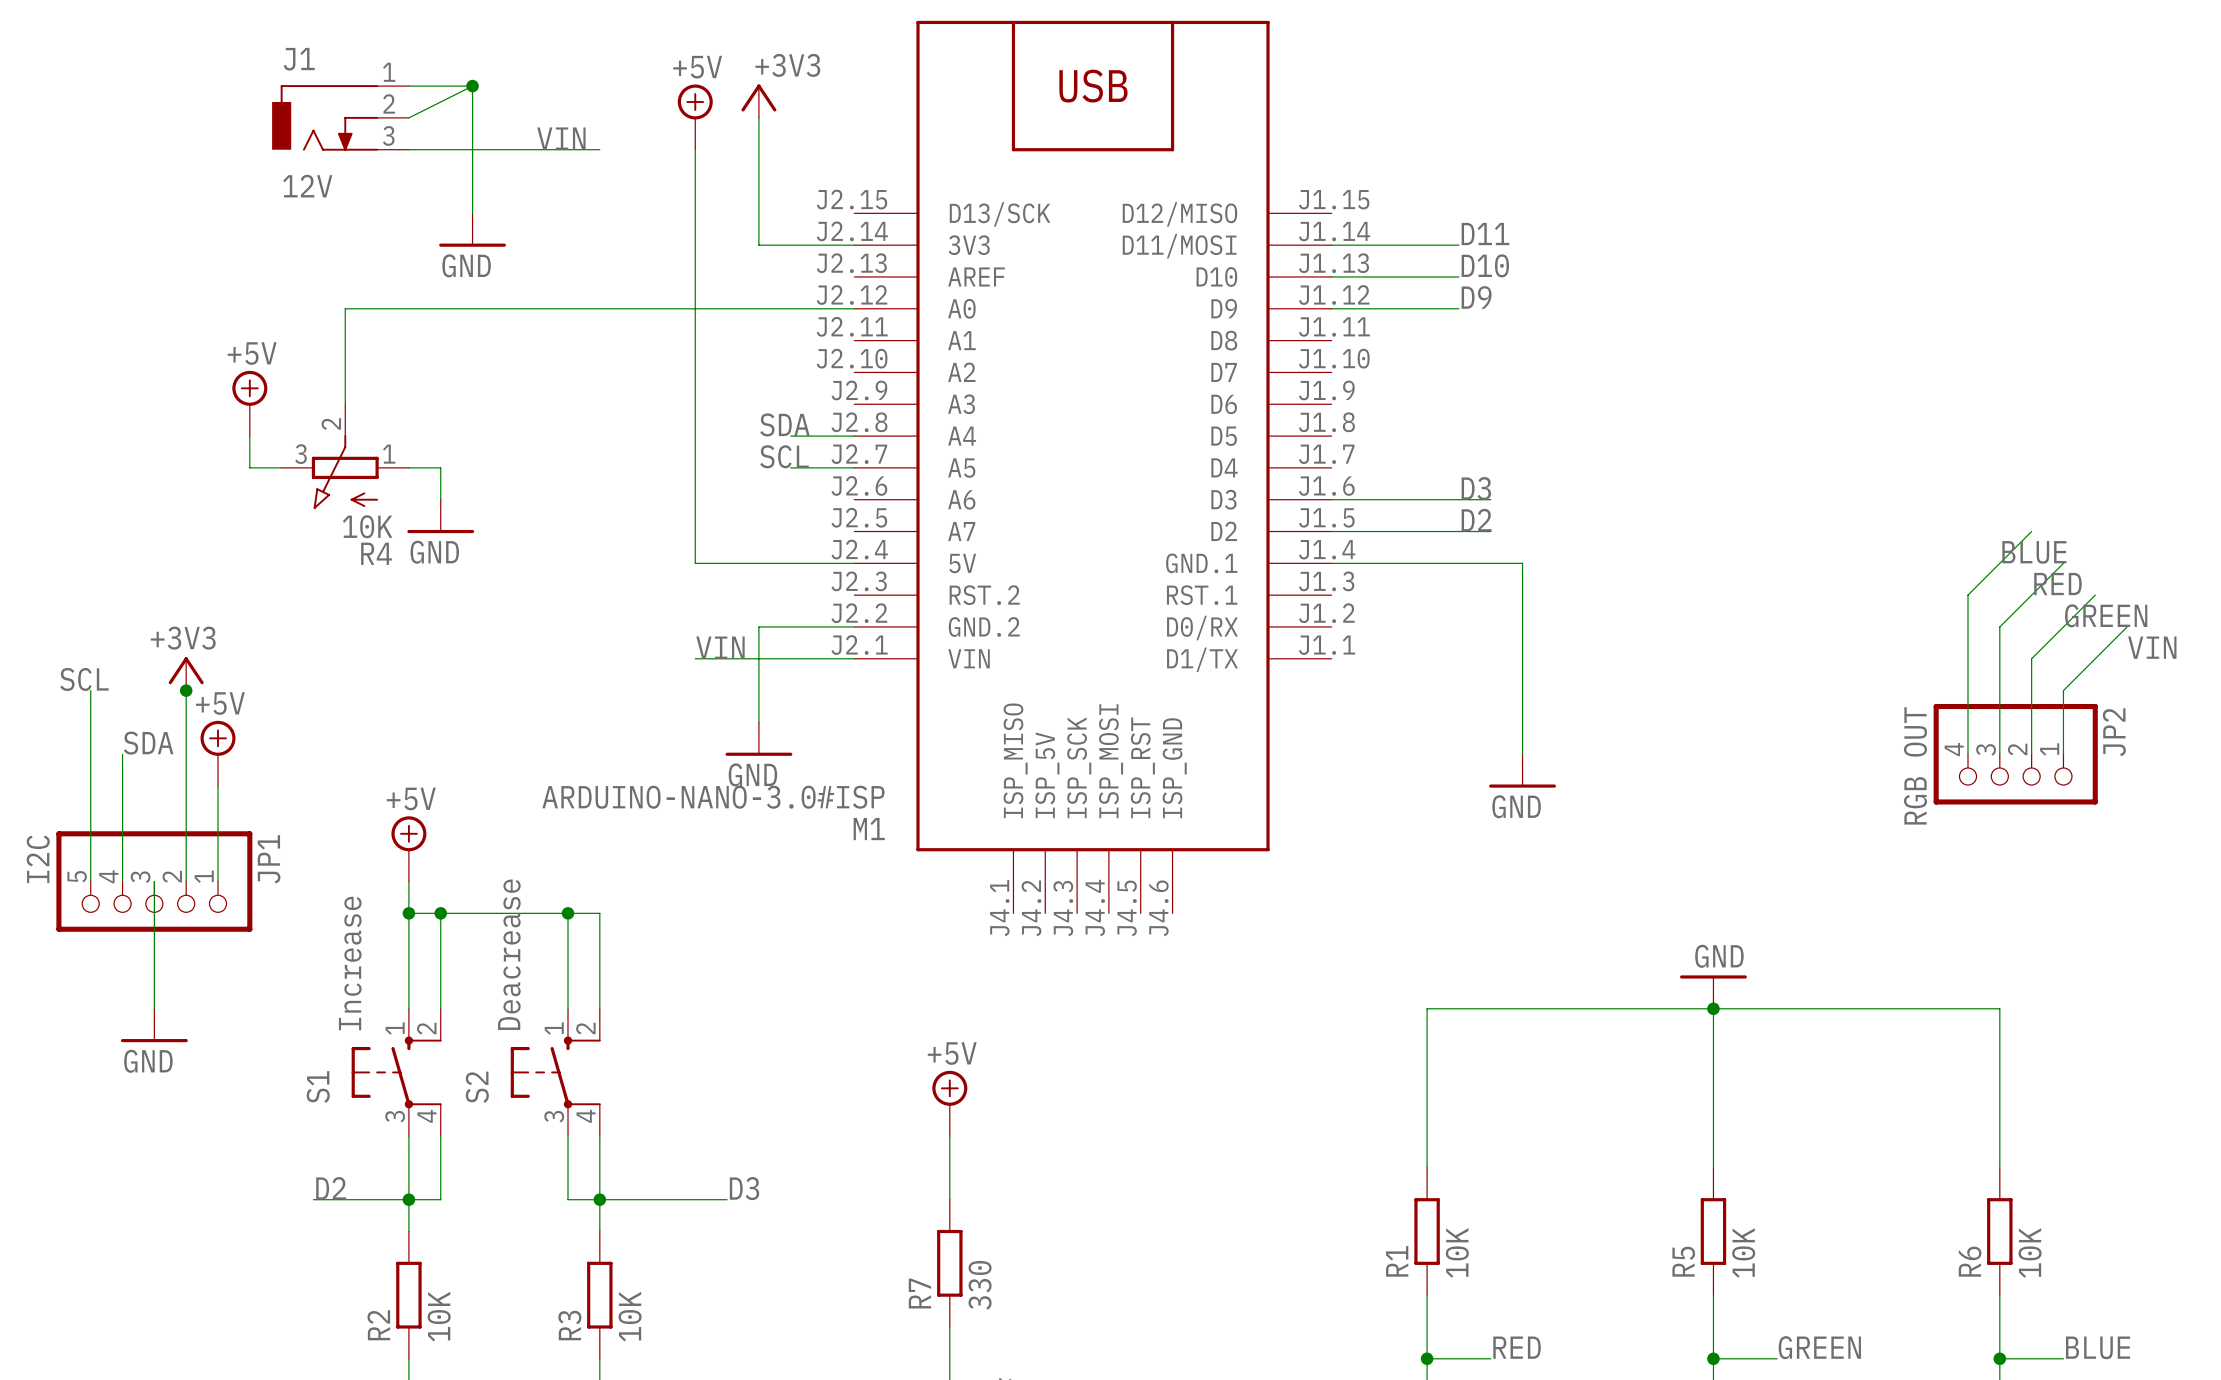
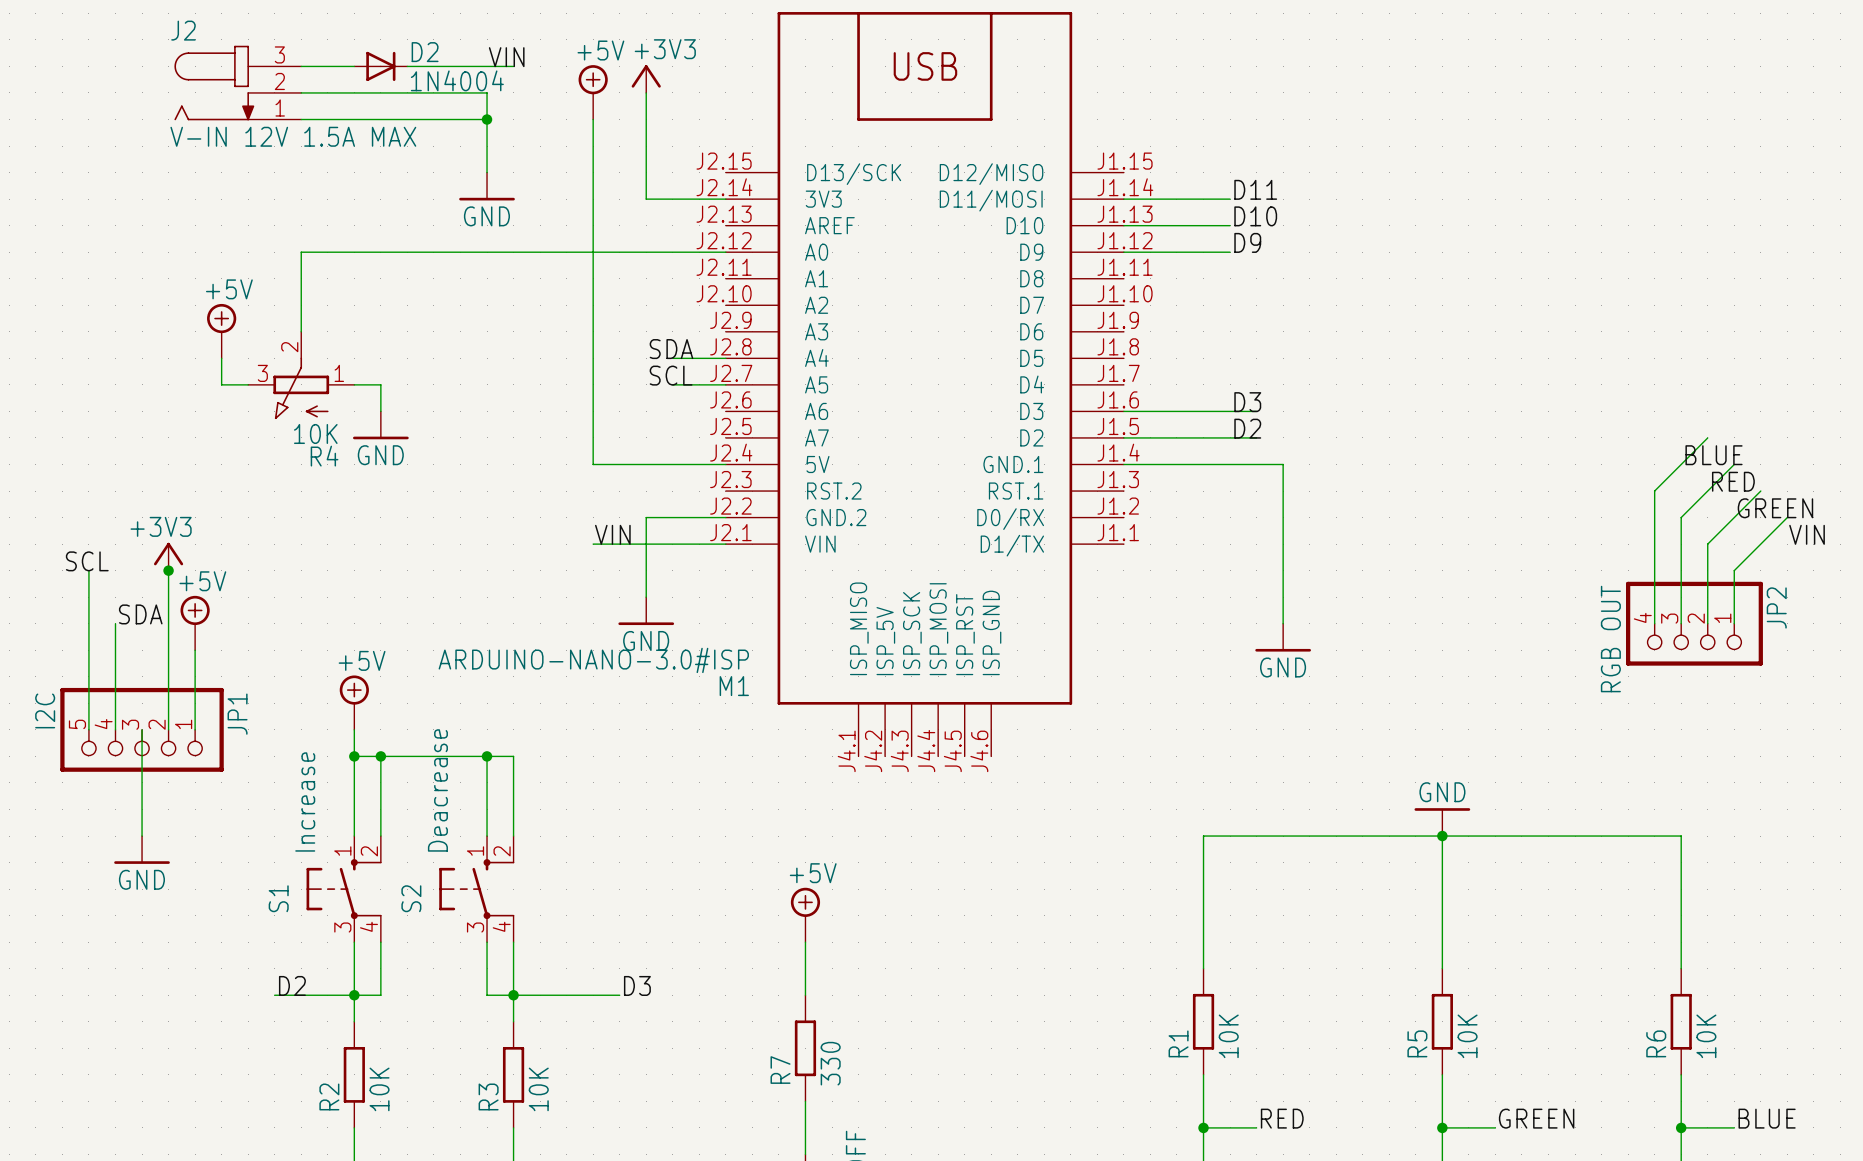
D2: none -> 1N4004 (380, 66)
wire: (472, 86) (472, 213) -> (407, 66) (513, 66)
wire: (472, 86) (408, 117) -> none
junction: (472, 86) -> none
J2: none -> V-IN 12V 1.5A MAX (237, 83)
J1: 12V (340, 117) -> none
wire: none -> (301, 92) (487, 92) (487, 172)
label position: VIN (561, 138) -> VIN (506, 57)
wire: (568, 149) (599, 149) -> none
junction: none -> (487, 119)
power symbol position: GND (472, 230) -> GND (487, 186)

